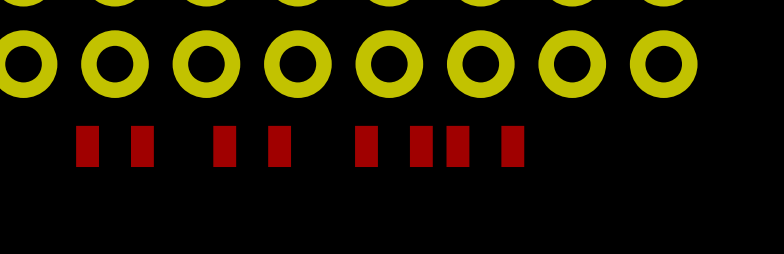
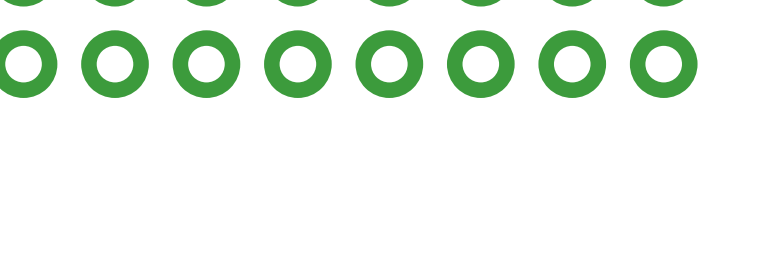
part: (114, 146) -> none
part: (252, 146) -> none
part: (393, 146) -> none
part: (485, 146) -> none

